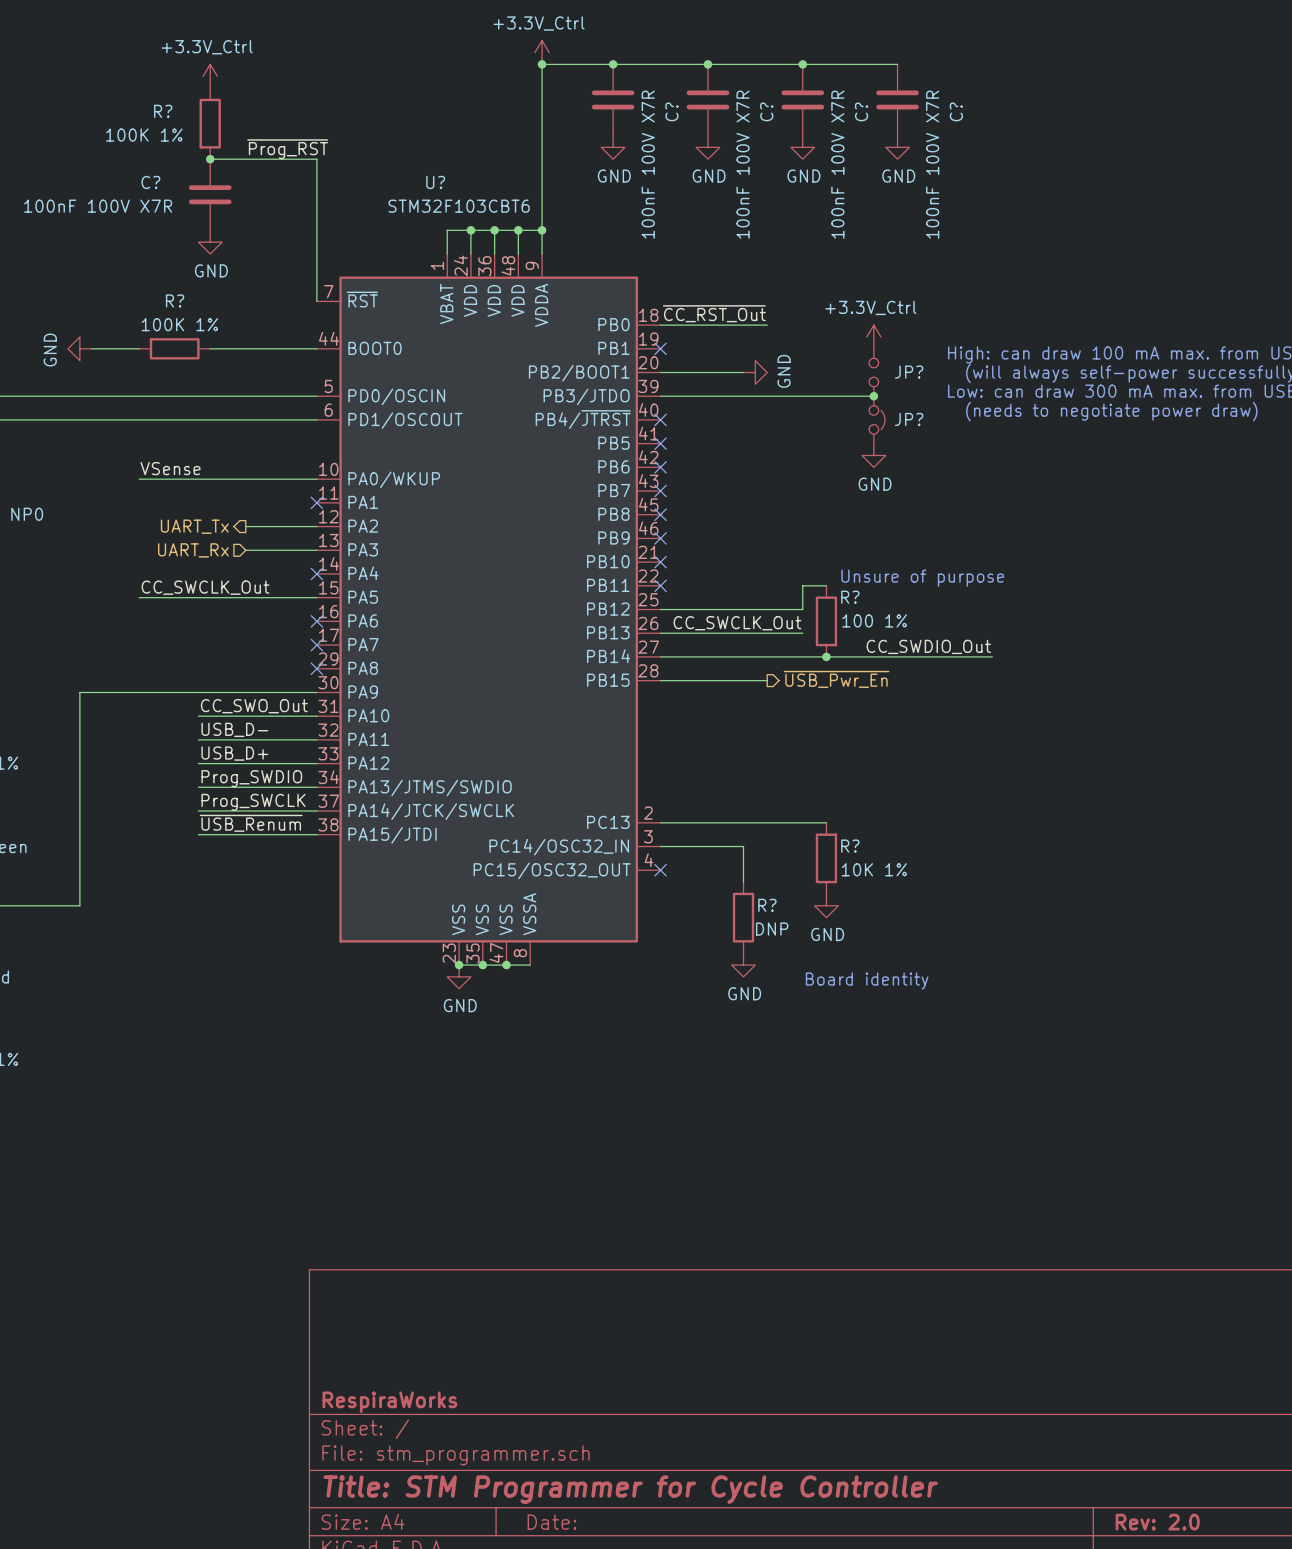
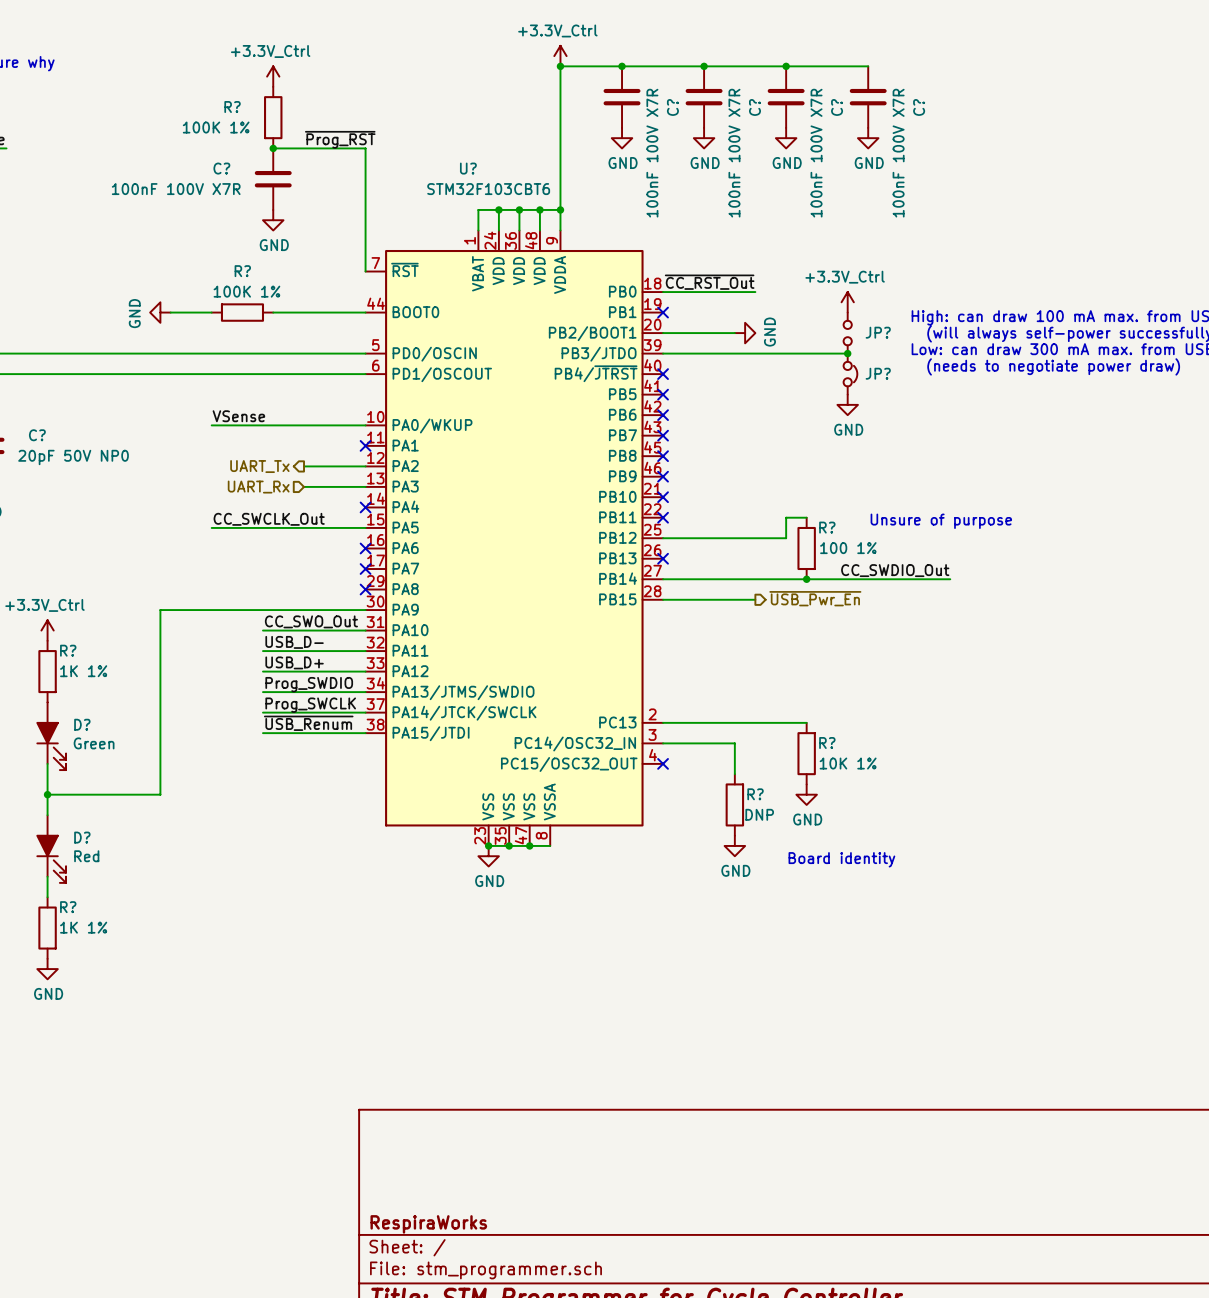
text position: Unsure of purpose (922, 578) -> Unsure of purpose (941, 521)
label: CC_SWCLK_Out (737, 623) -> none
wire: (660, 633) (802, 633) -> none
no-connect mark: none -> (663, 558)

